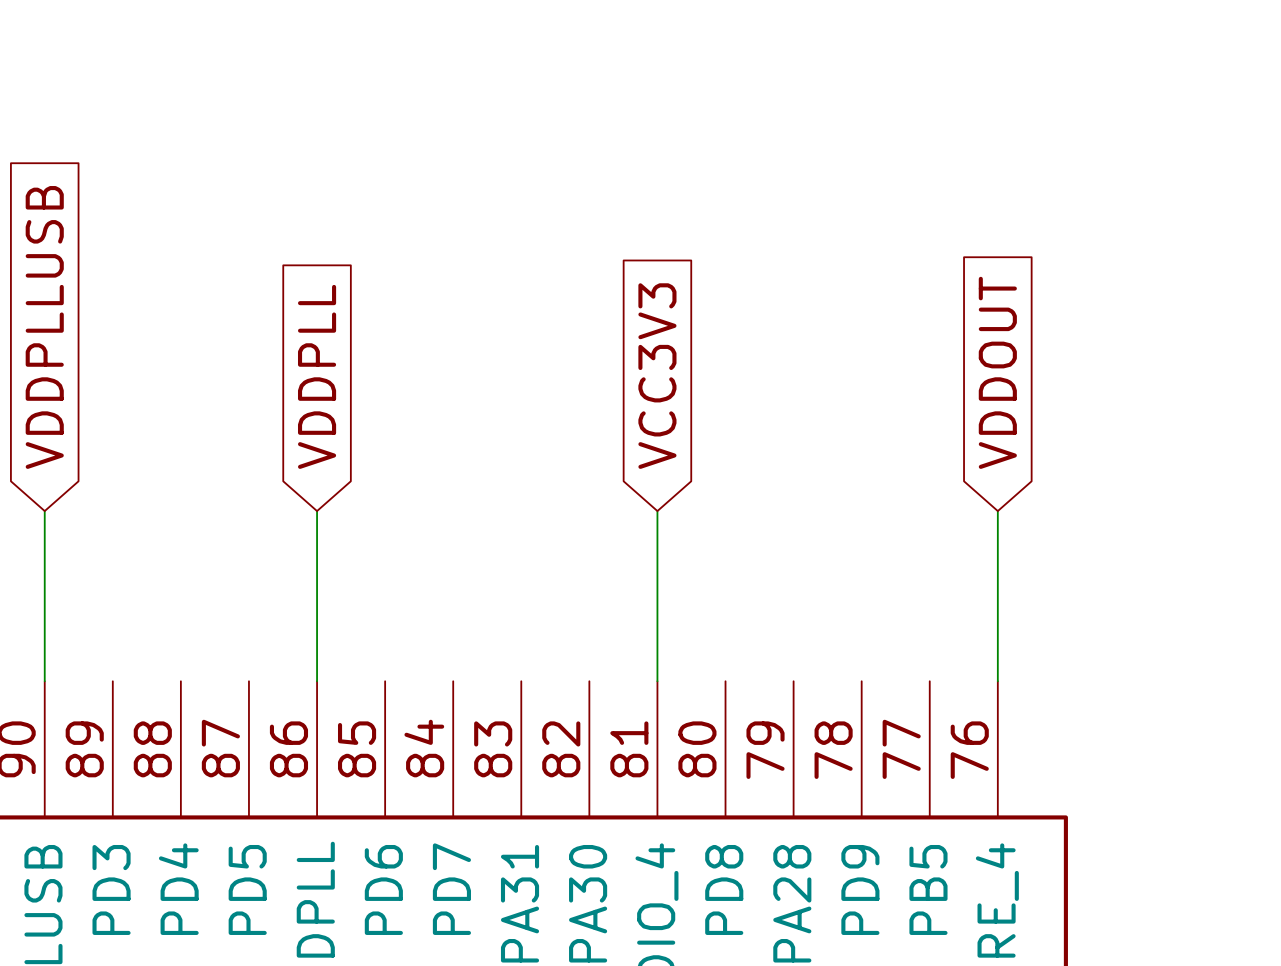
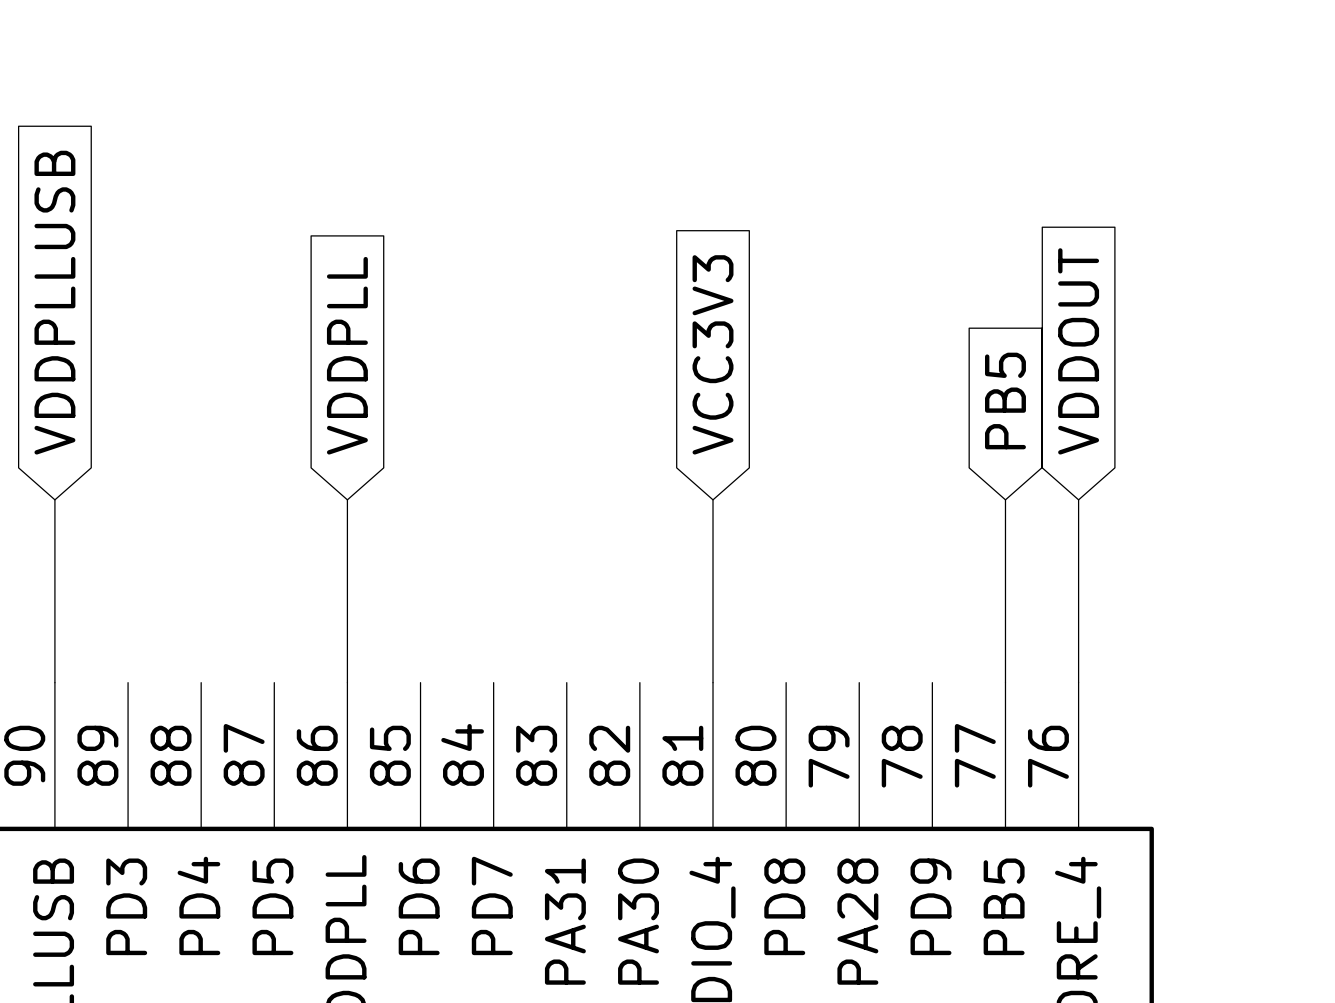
global label: none -> PB5 (1005, 401)
wire: none -> (1005, 499) (1005, 682)

